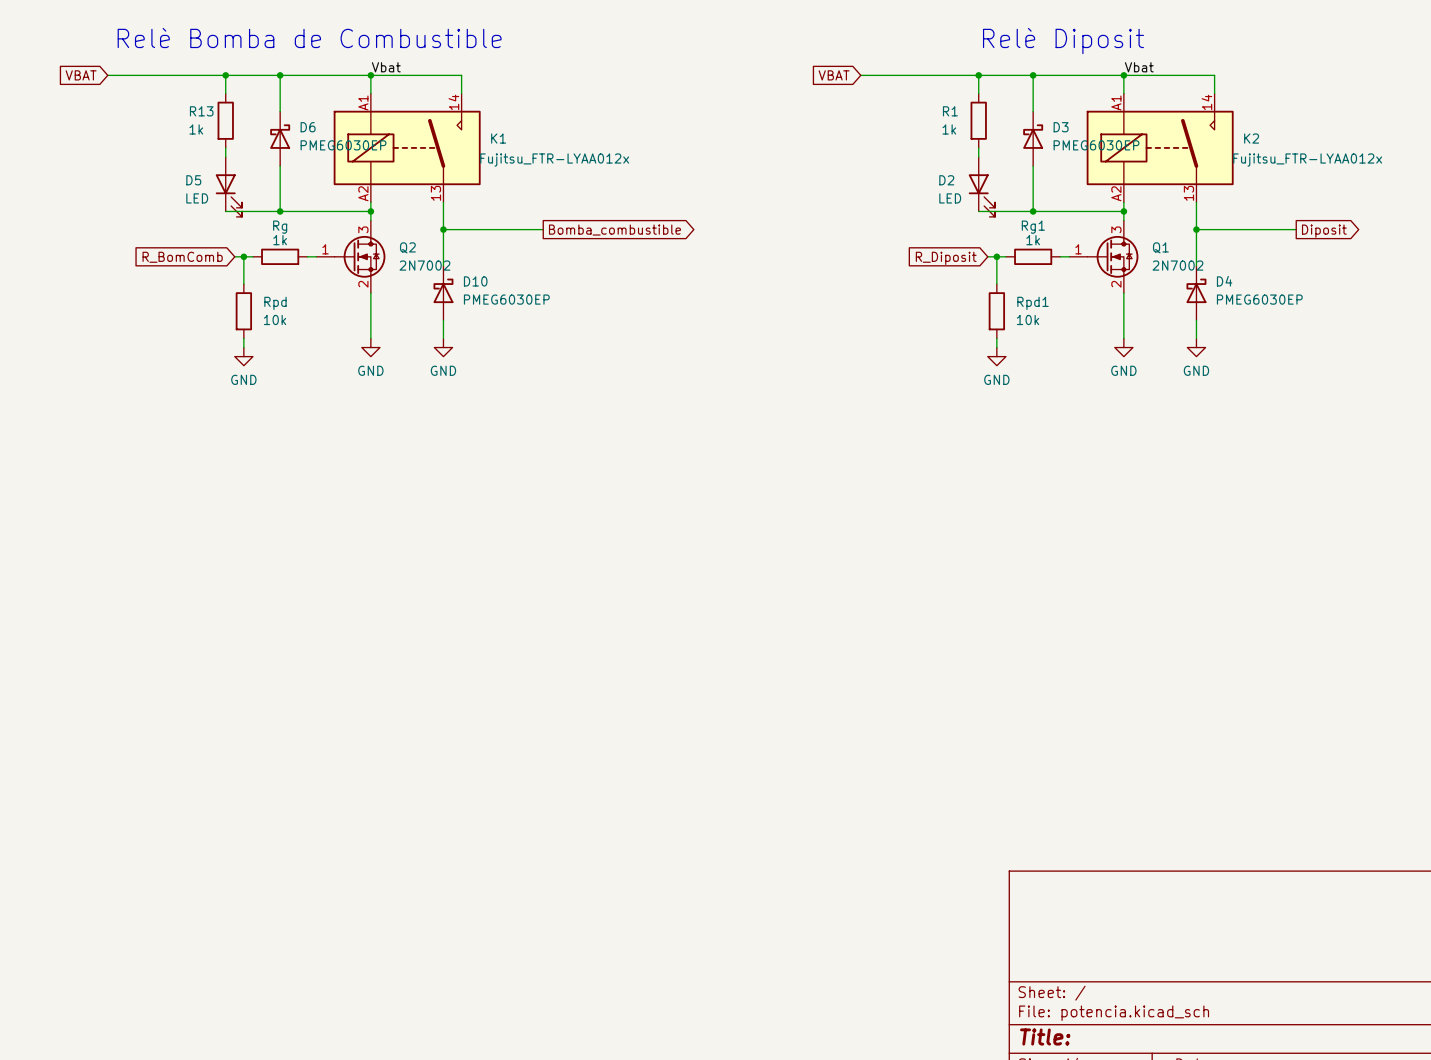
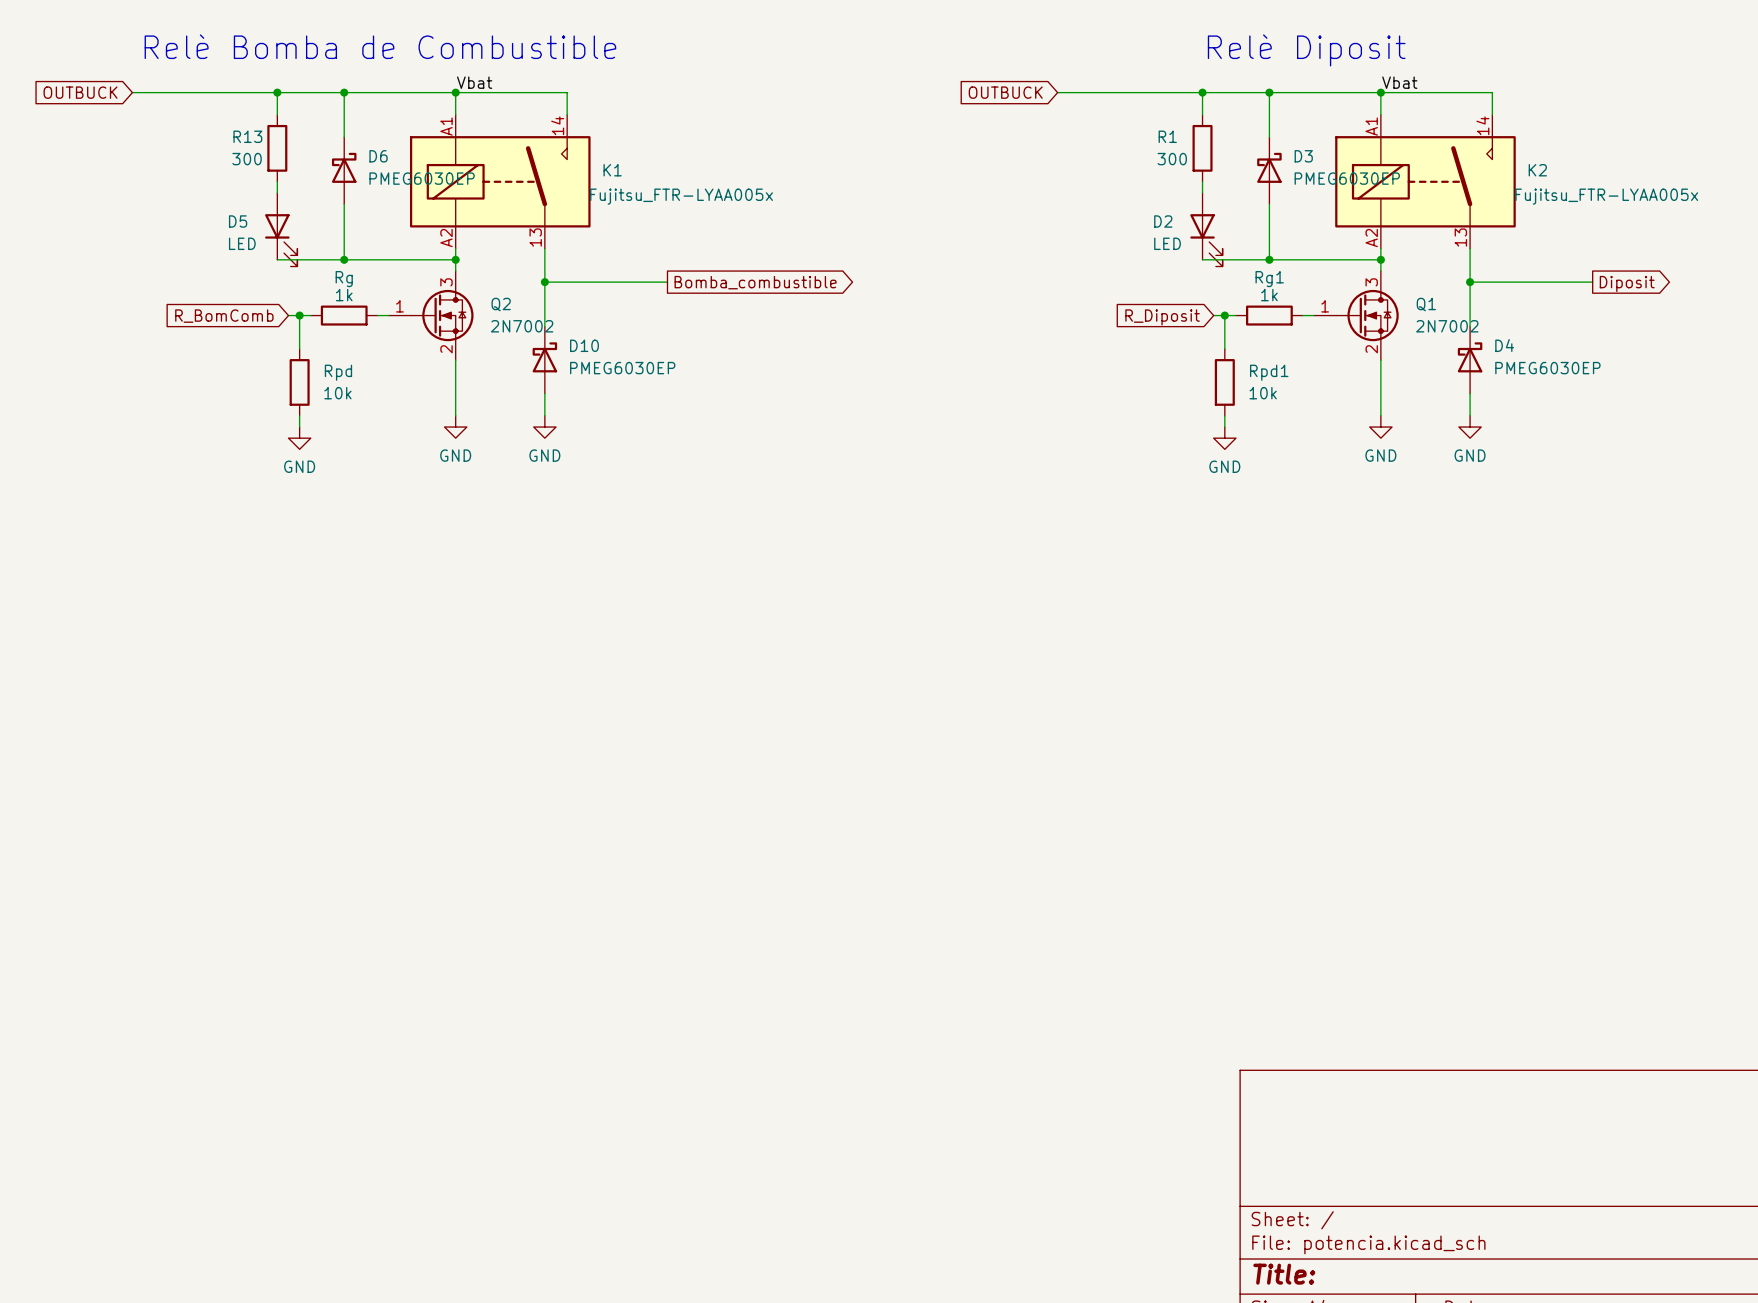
global label: VBAT (81, 75) -> OUTBUCK (80, 92)
global label: VBAT (834, 75) -> OUTBUCK (1005, 92)
R13 value: 1k (196, 129) -> 300 (247, 159)
R1 value: 1k (949, 129) -> 300 (1172, 159)
K1 value: Fujitsu_FTR-LYAA012x (554, 160) -> Fujitsu_FTR-LYAA005x (681, 196)
K2 value: Fujitsu_FTR-LYAA012x (1307, 160) -> Fujitsu_FTR-LYAA005x (1606, 196)

